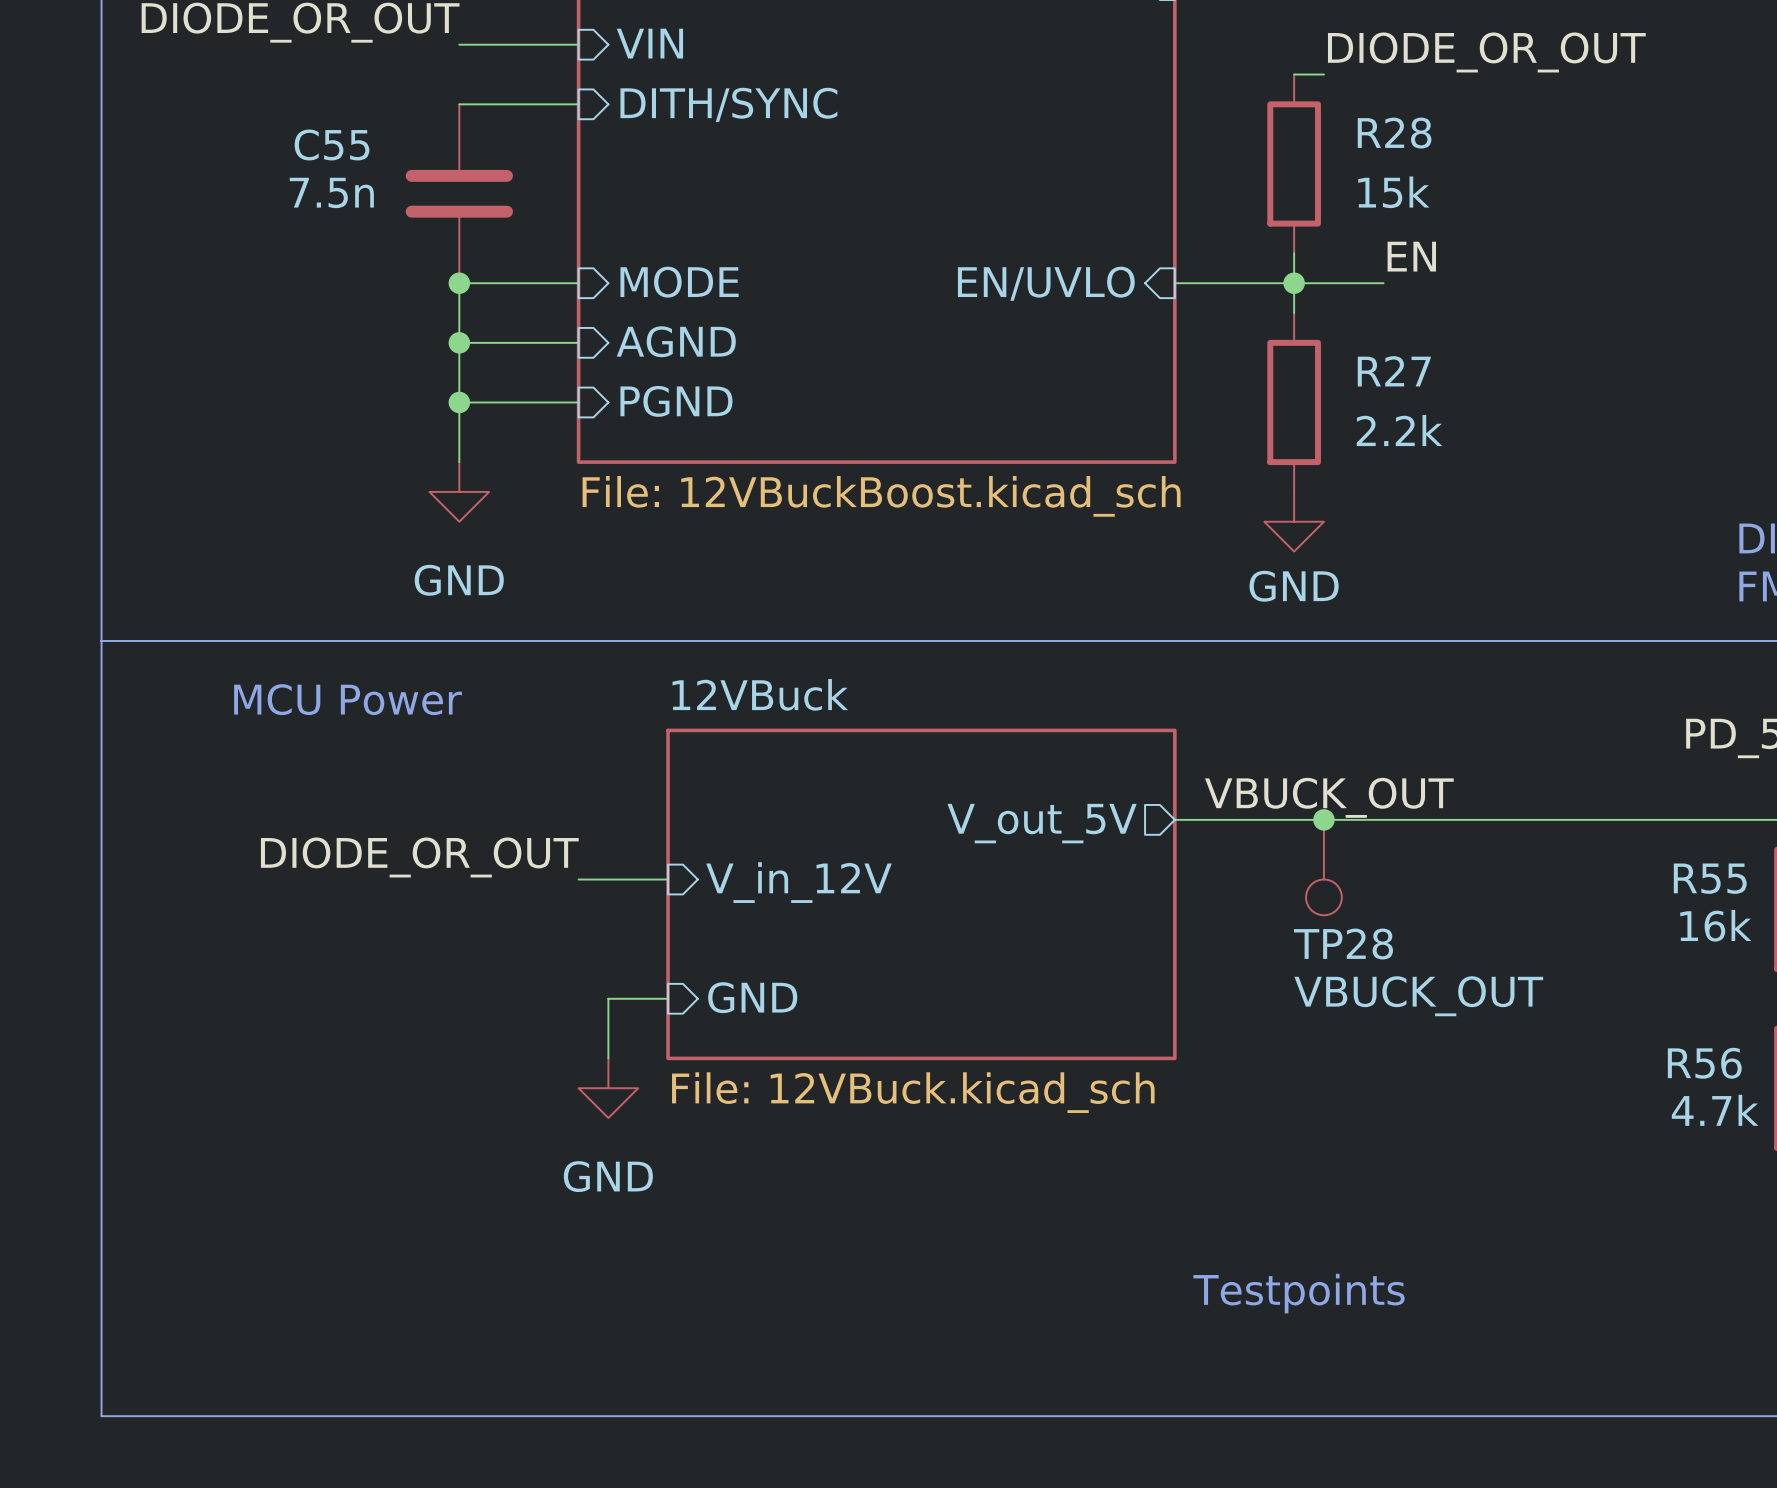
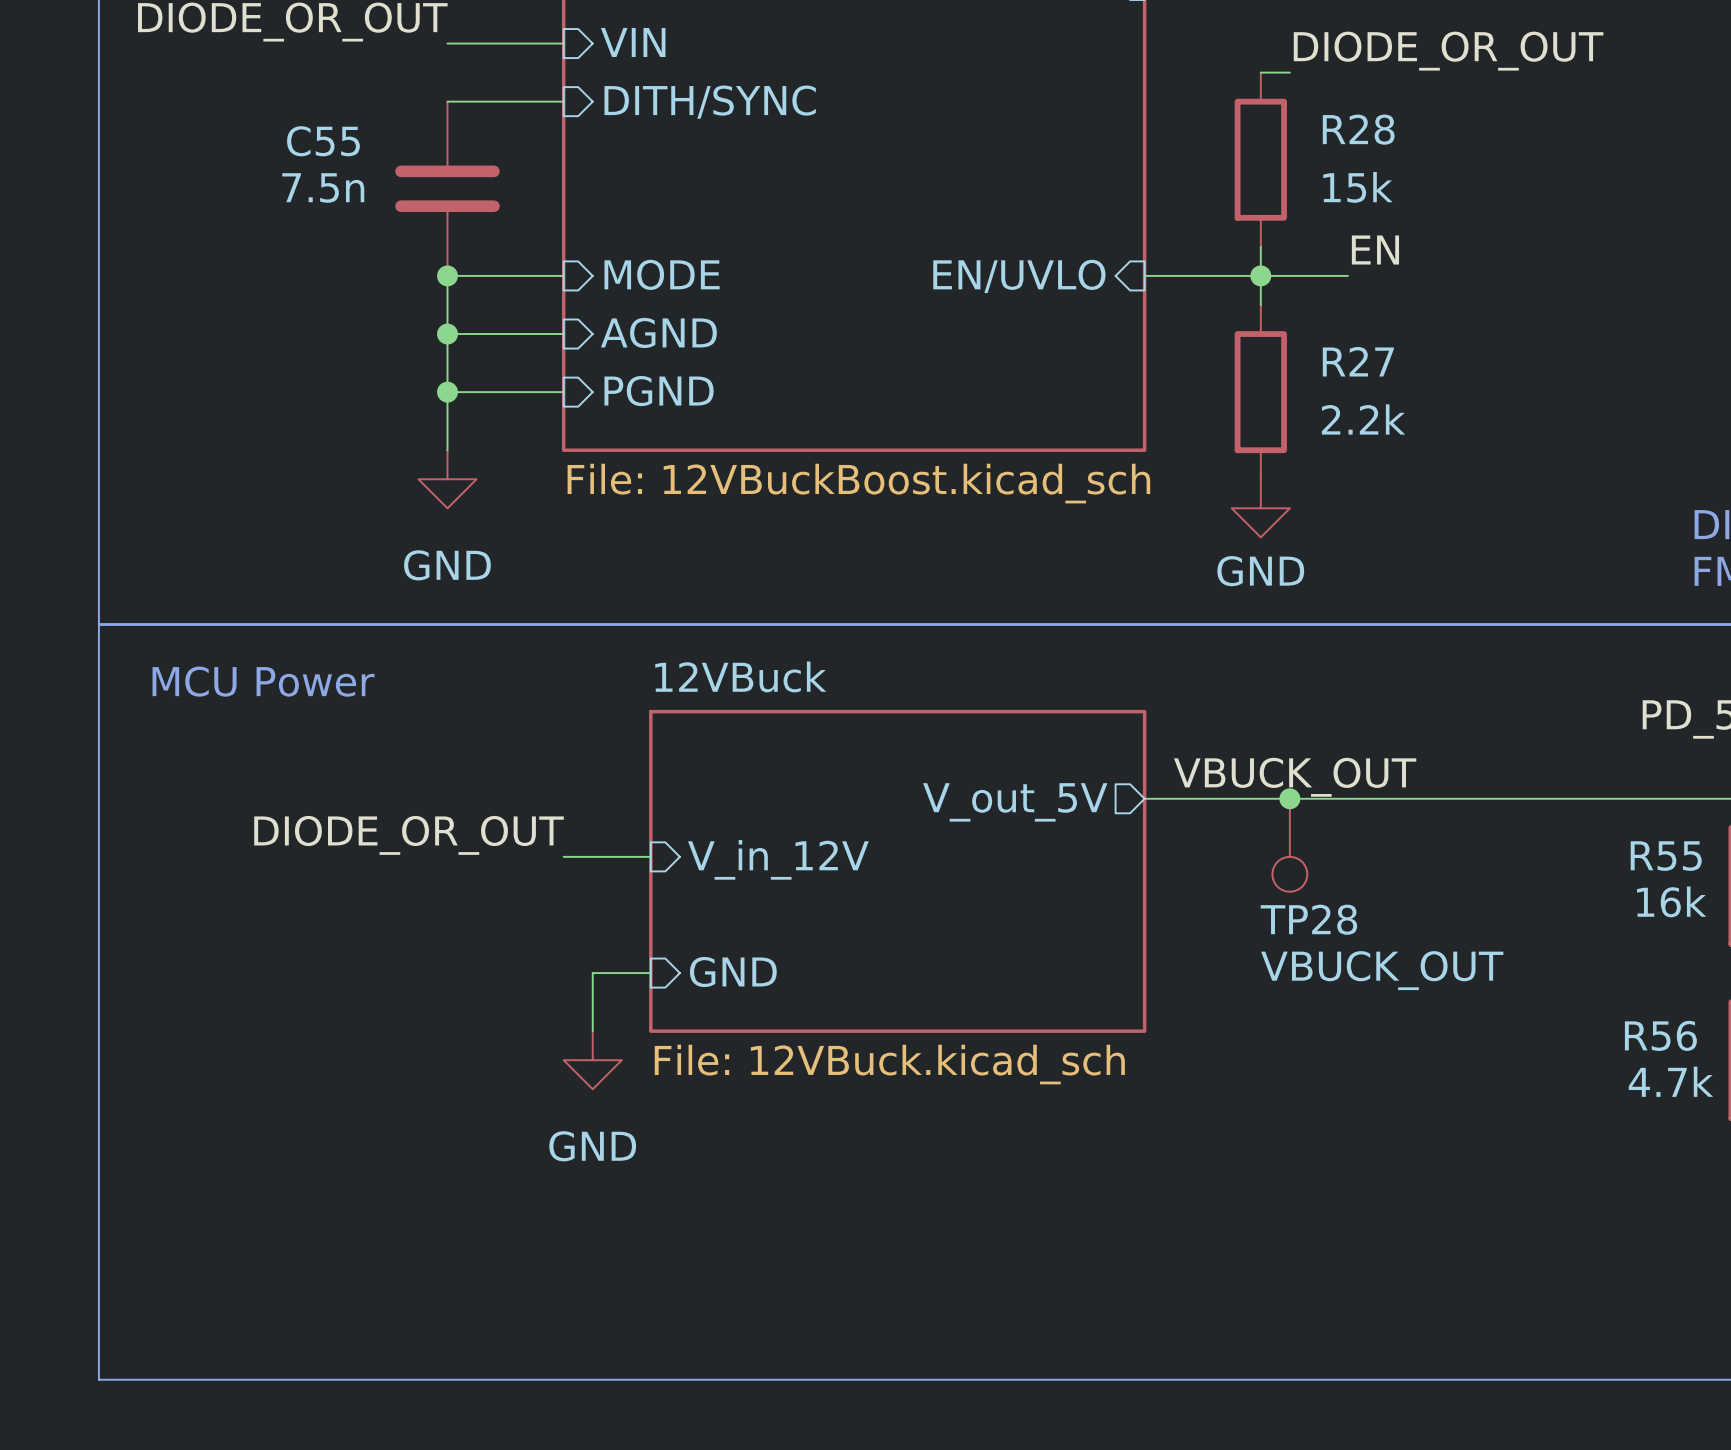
text position: MCU Power (348, 699) -> MCU Power (263, 681)
text: Testpoints (1299, 1293) -> none

